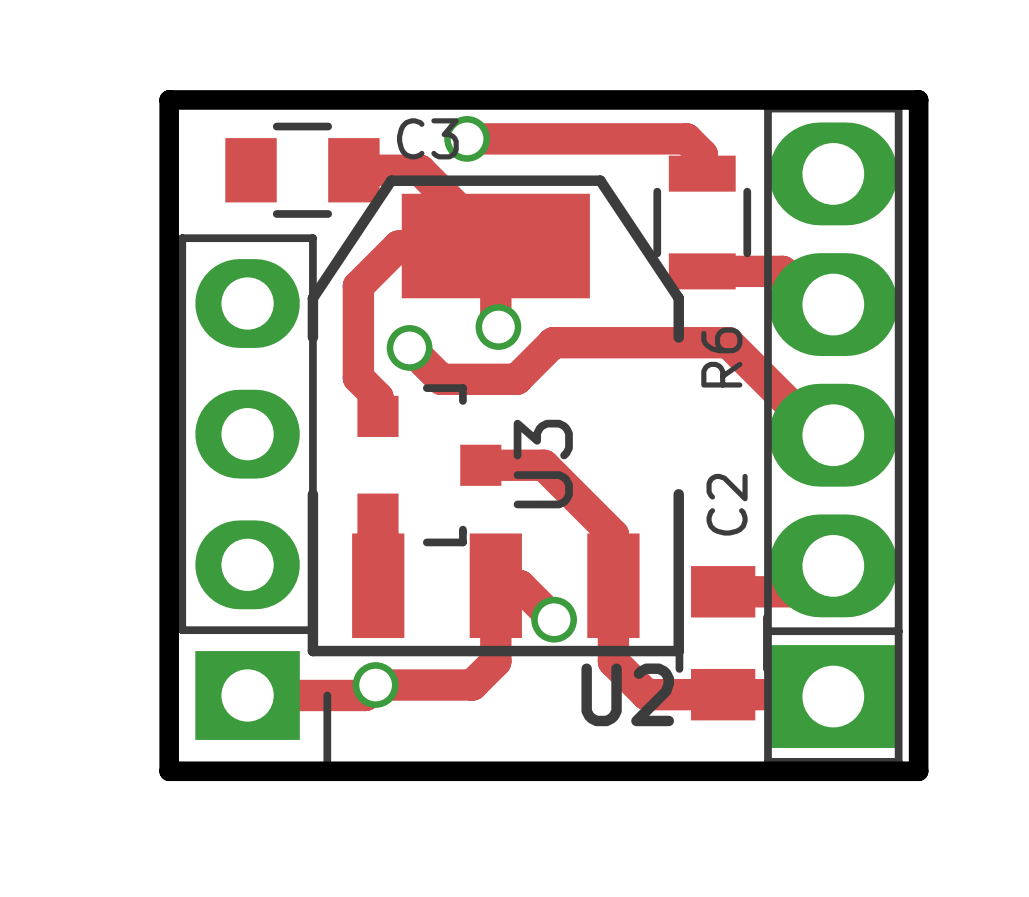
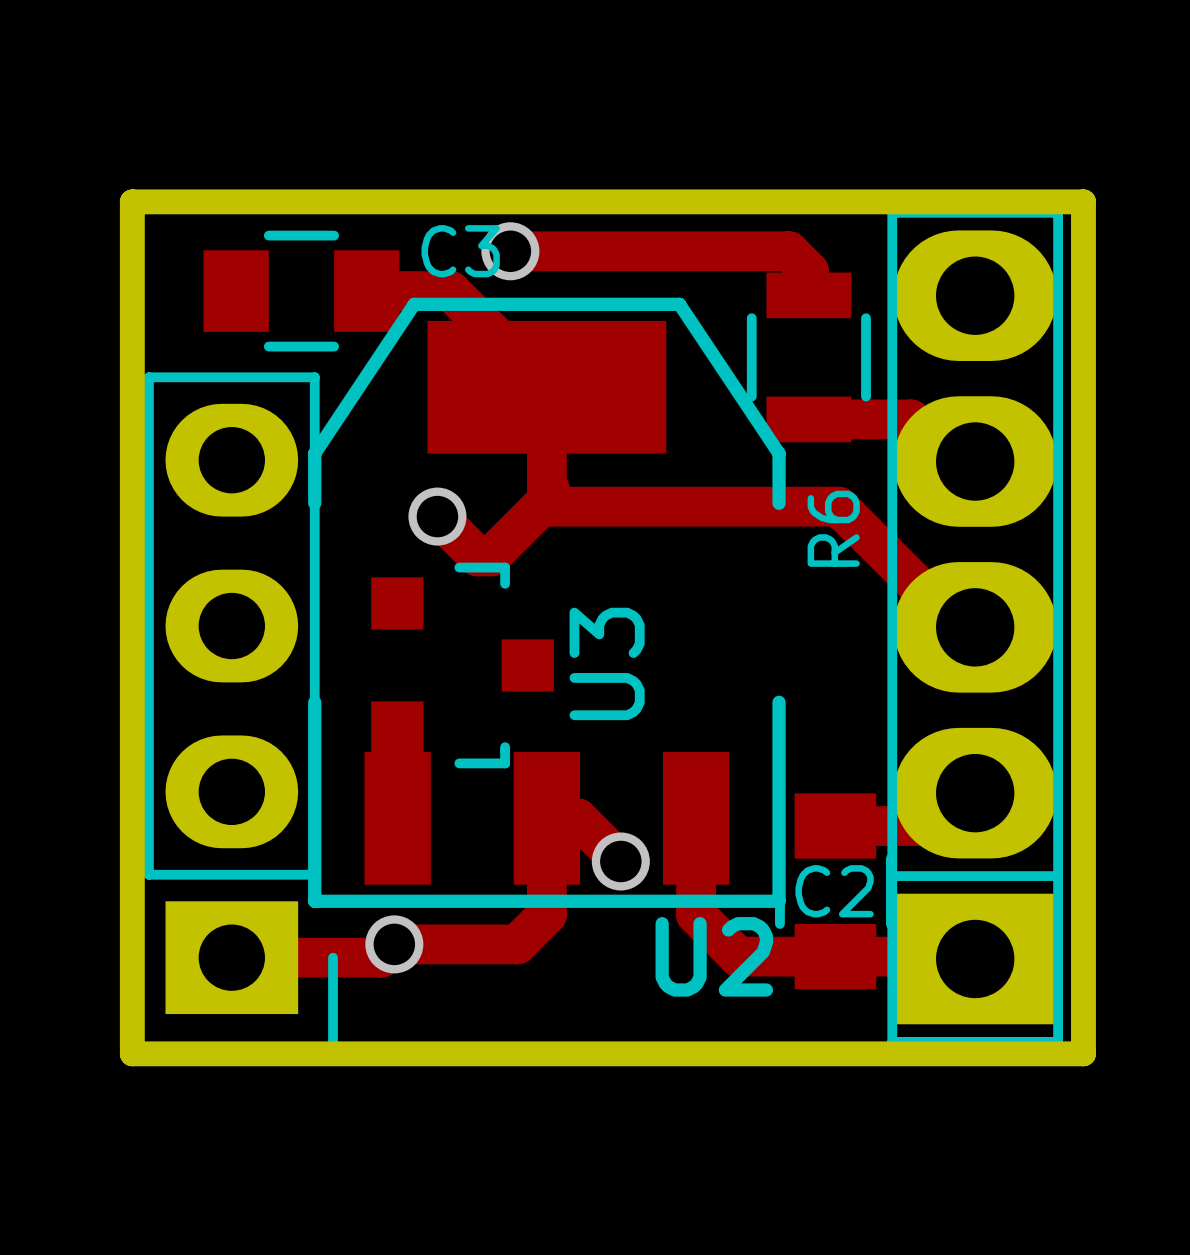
track: (495, 246) (398, 246) (358, 286) (358, 377) (377, 397) (377, 416) -> none
via: (498, 327) -> none
track: (728, 342) (553, 342) (516, 379) (451, 379) -> (842, 509) (838, 506) (540, 506) (491, 556)
track: (480, 465) (543, 465) (613, 534) (613, 585) -> none
C2 name rotation: 0° (727, 504) -> 90° clockwise (834, 891)
C2 name position: C2 (727, 504) -> C2 (834, 891)

